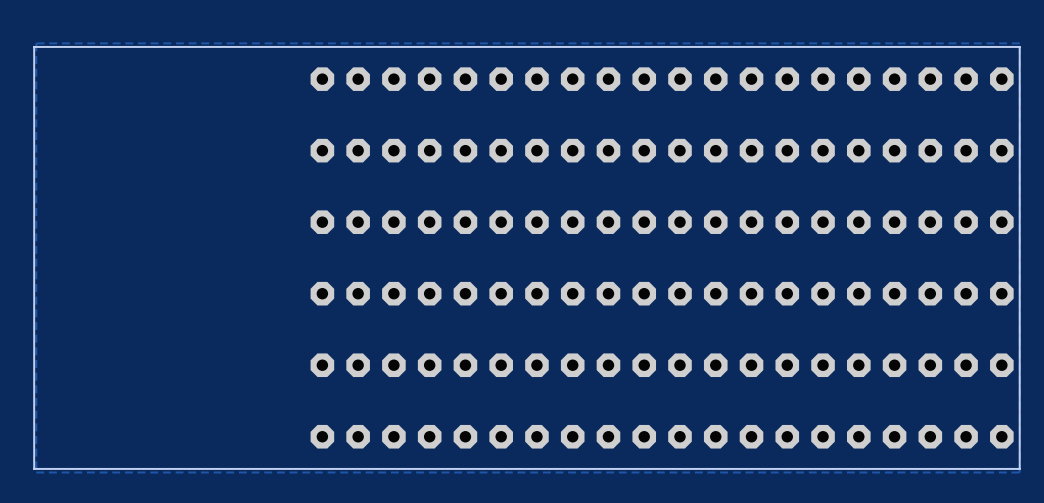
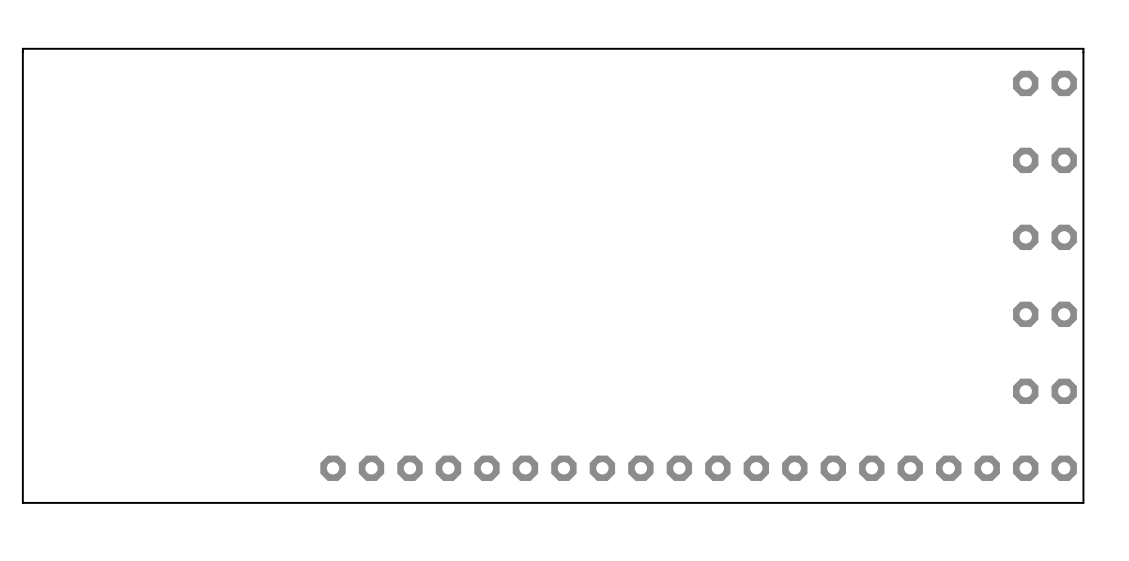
zone outline: (1019, 43) (36, 43) (36, 472) (1019, 472) (1019, 43) -> none
part: (340, 79) -> none
part: (411, 79) -> none
part: (483, 79) -> none
part: (554, 79) -> none
part: (626, 79) -> none
part: (697, 79) -> none
part: (769, 79) -> none
part: (840, 79) -> none
part: (912, 79) -> none
part: (340, 150) -> none
part: (411, 150) -> none
part: (483, 150) -> none
part: (554, 150) -> none
part: (626, 150) -> none
part: (697, 150) -> none
part: (769, 150) -> none
part: (840, 150) -> none
part: (912, 150) -> none
part: (340, 222) -> none
part: (411, 222) -> none
part: (483, 222) -> none
part: (554, 222) -> none
part: (626, 222) -> none
part: (697, 222) -> none
part: (769, 222) -> none
part: (840, 222) -> none
part: (912, 222) -> none
part: (340, 293) -> none
part: (411, 293) -> none
part: (483, 293) -> none
part: (554, 293) -> none
part: (626, 293) -> none
part: (697, 293) -> none
part: (769, 293) -> none
part: (840, 293) -> none
part: (912, 293) -> none
part: (340, 365) -> none
part: (411, 365) -> none
part: (483, 365) -> none
part: (554, 365) -> none
part: (626, 365) -> none
part: (697, 365) -> none
part: (769, 365) -> none
part: (840, 365) -> none
part: (912, 365) -> none

